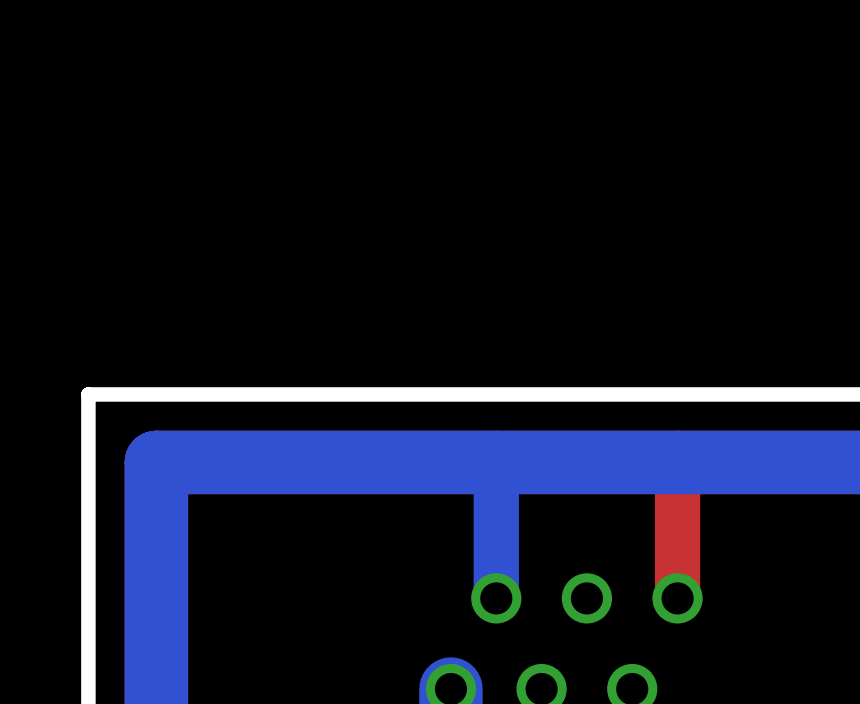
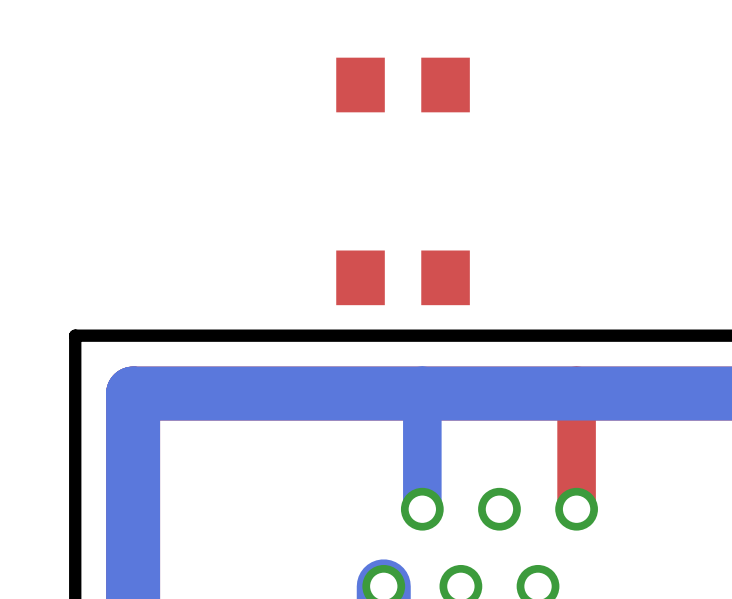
part: none -> (403, 85)
part: none -> (403, 277)

